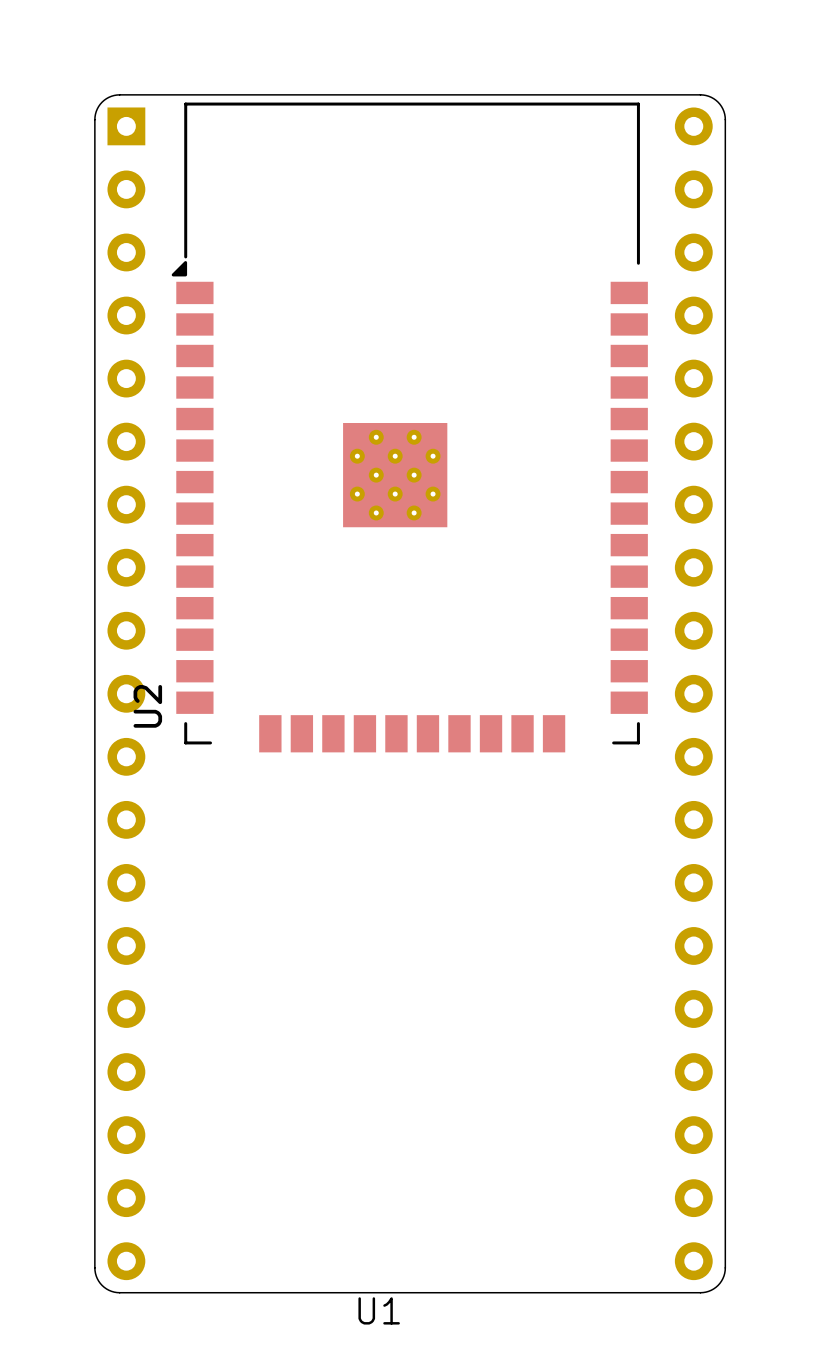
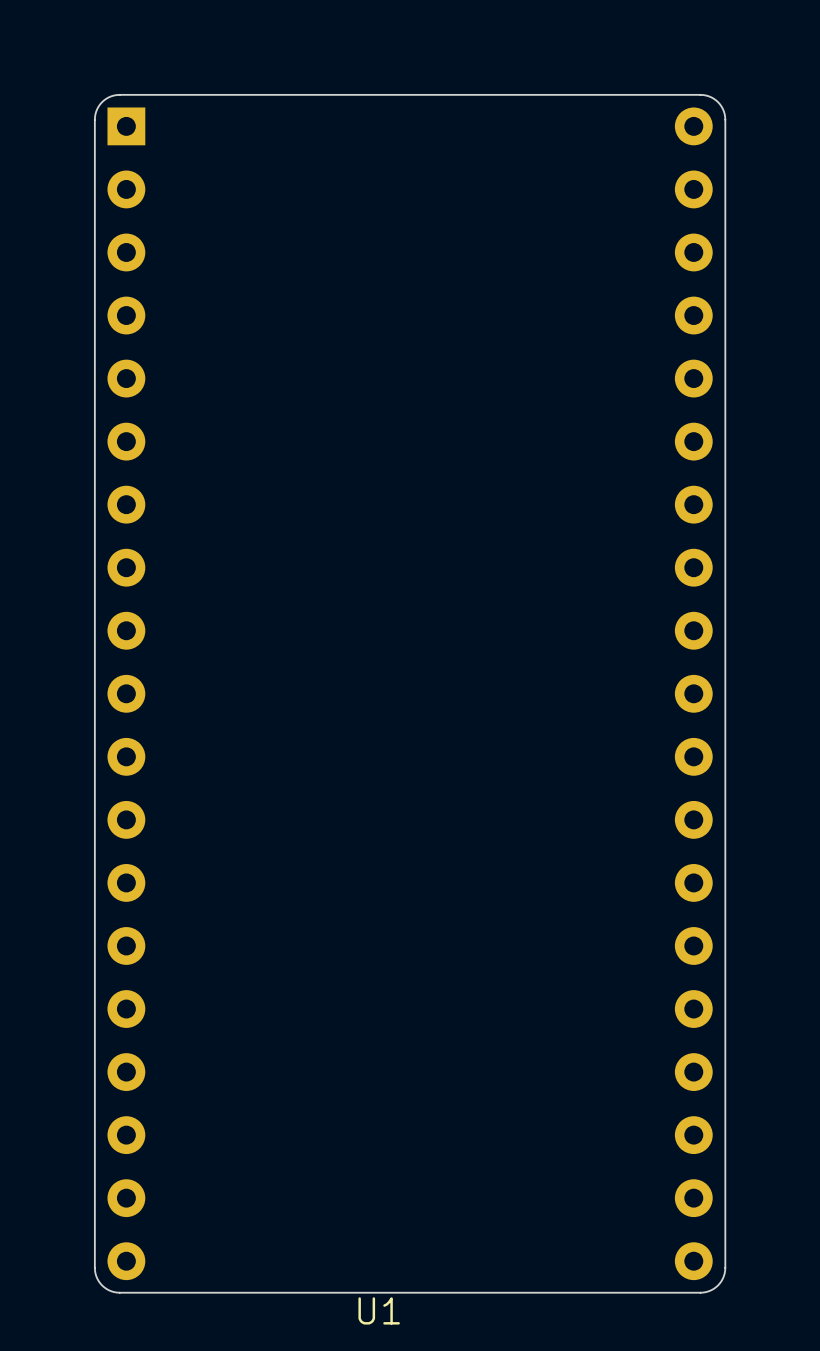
U2: (409, 427) -> none

